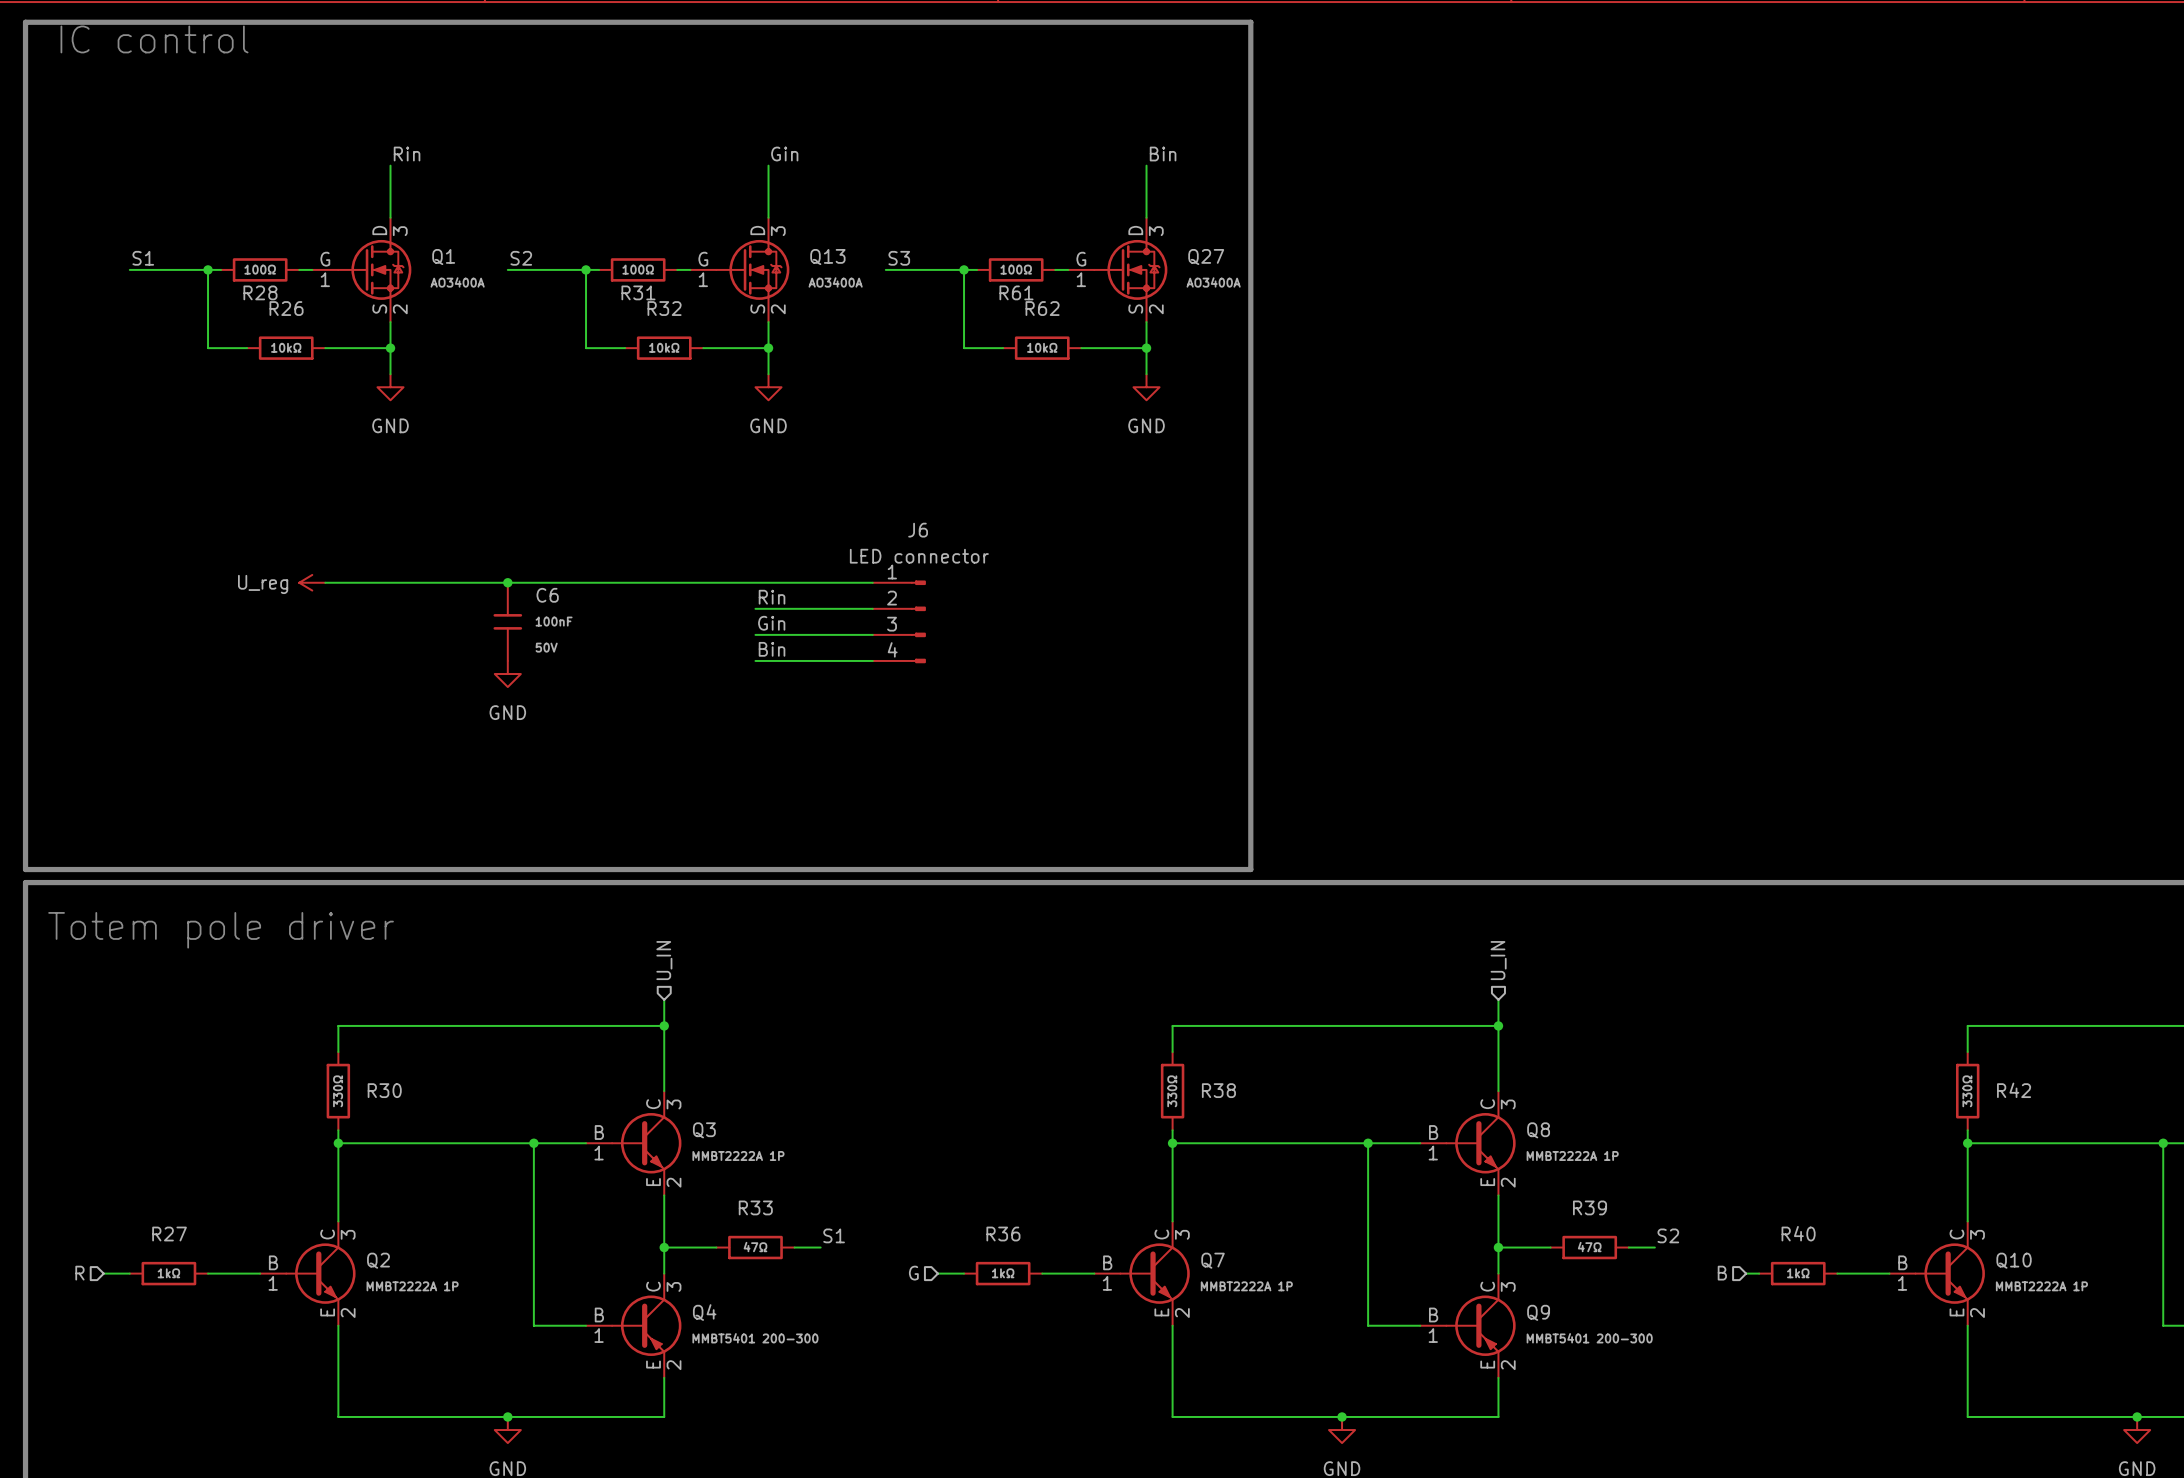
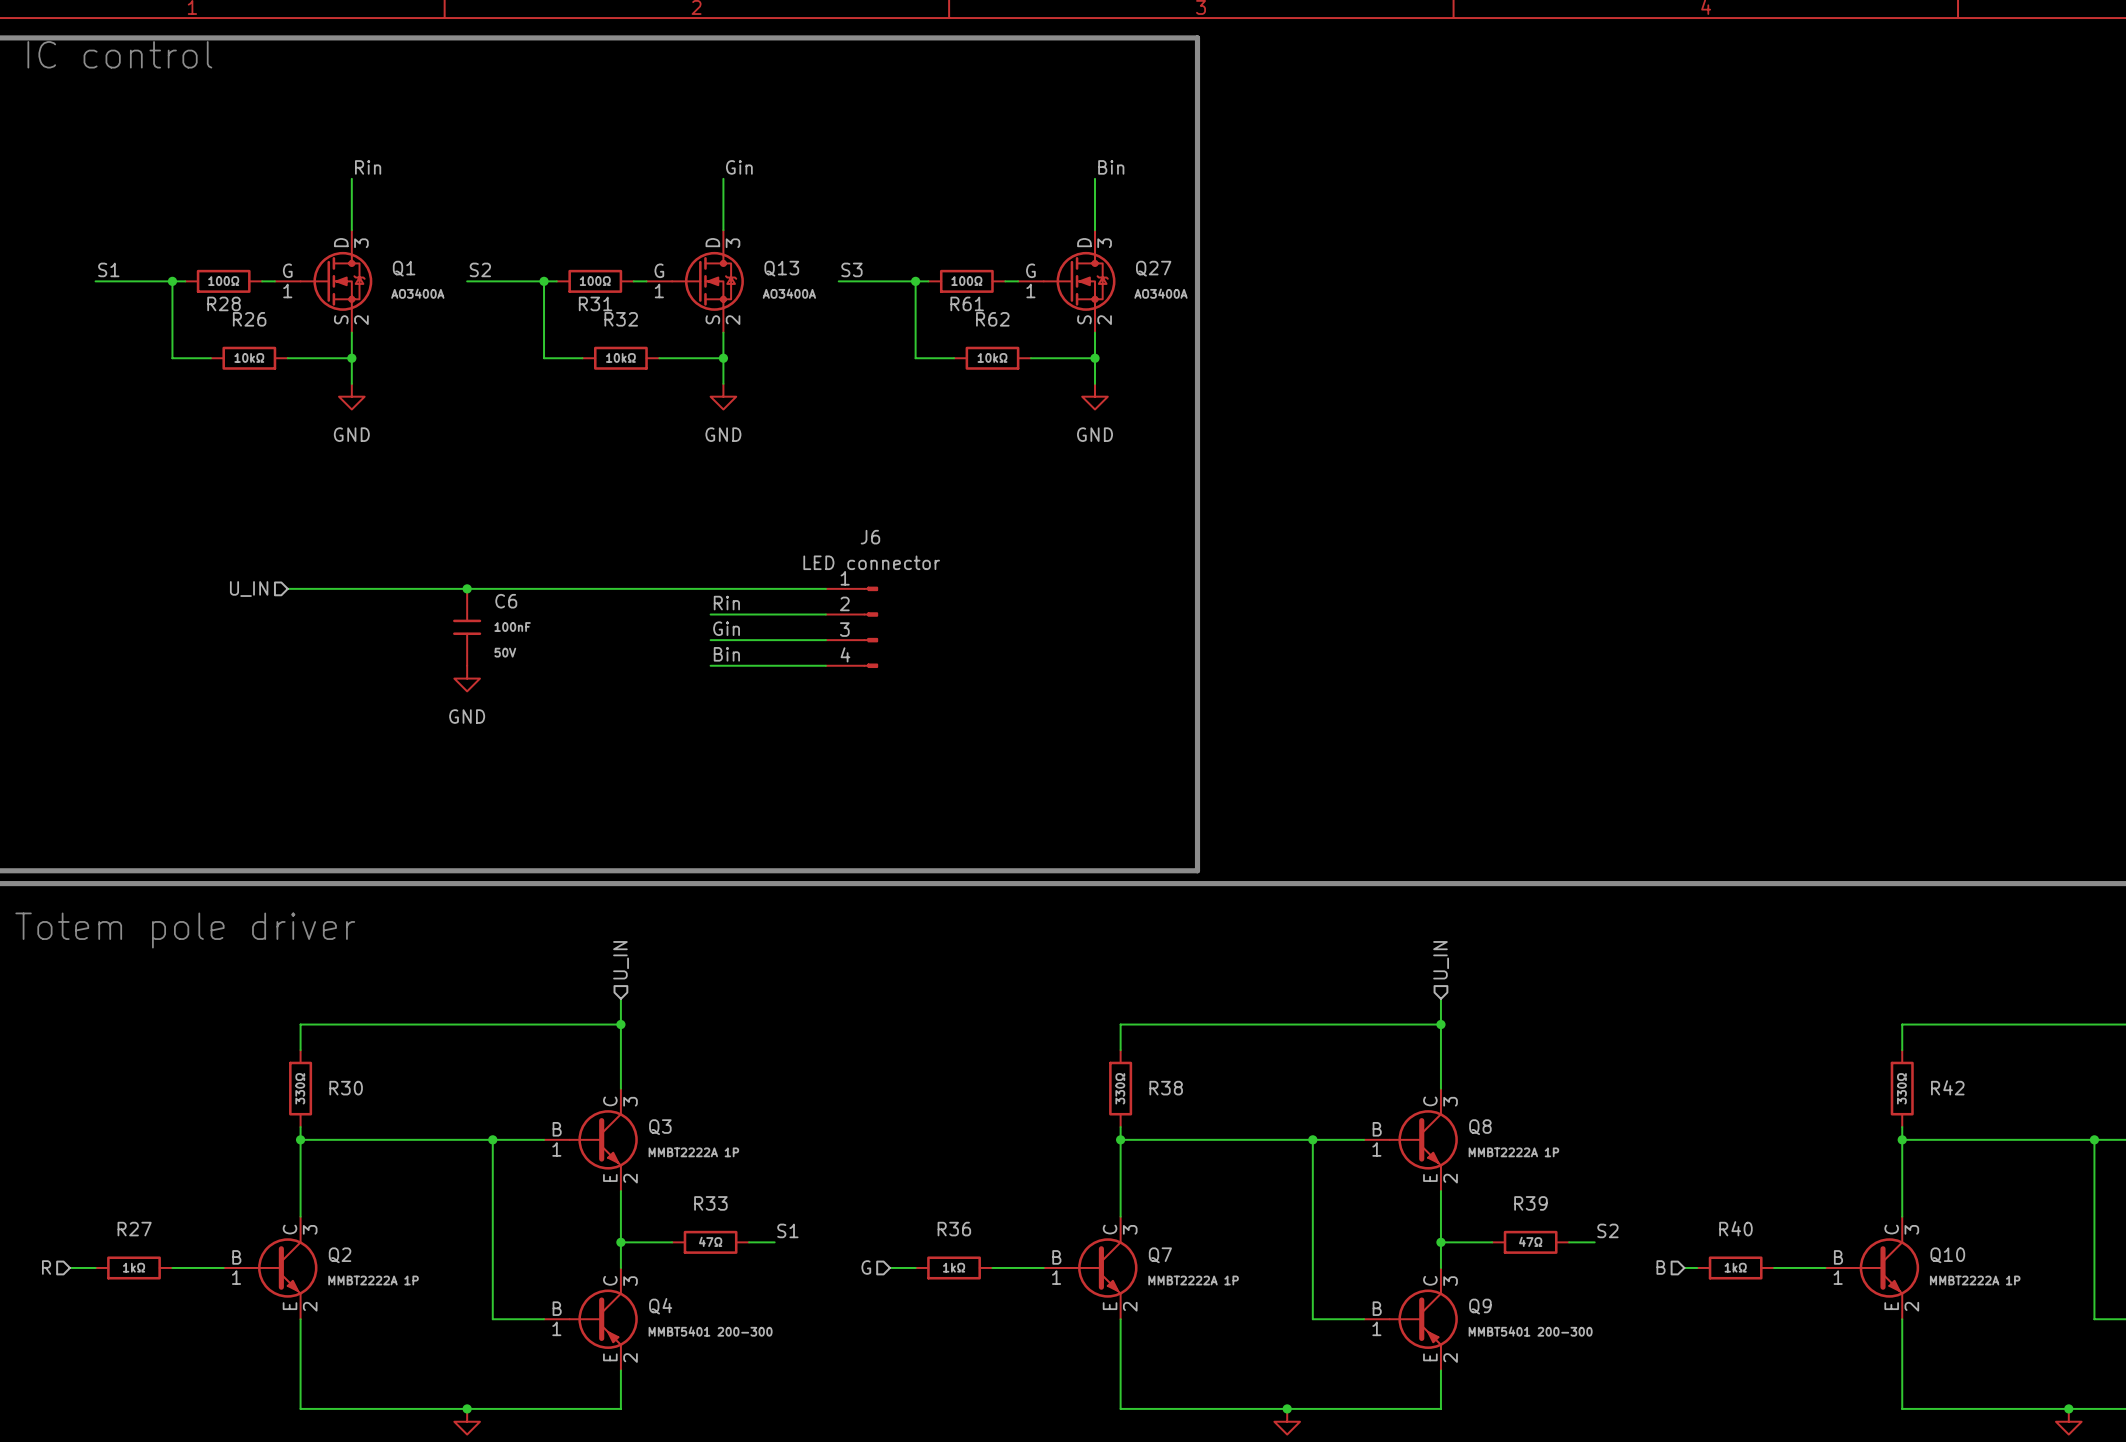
hierarchical label: none -> U_IN (249, 589)
power symbol: U_reg (312, 582) -> none

